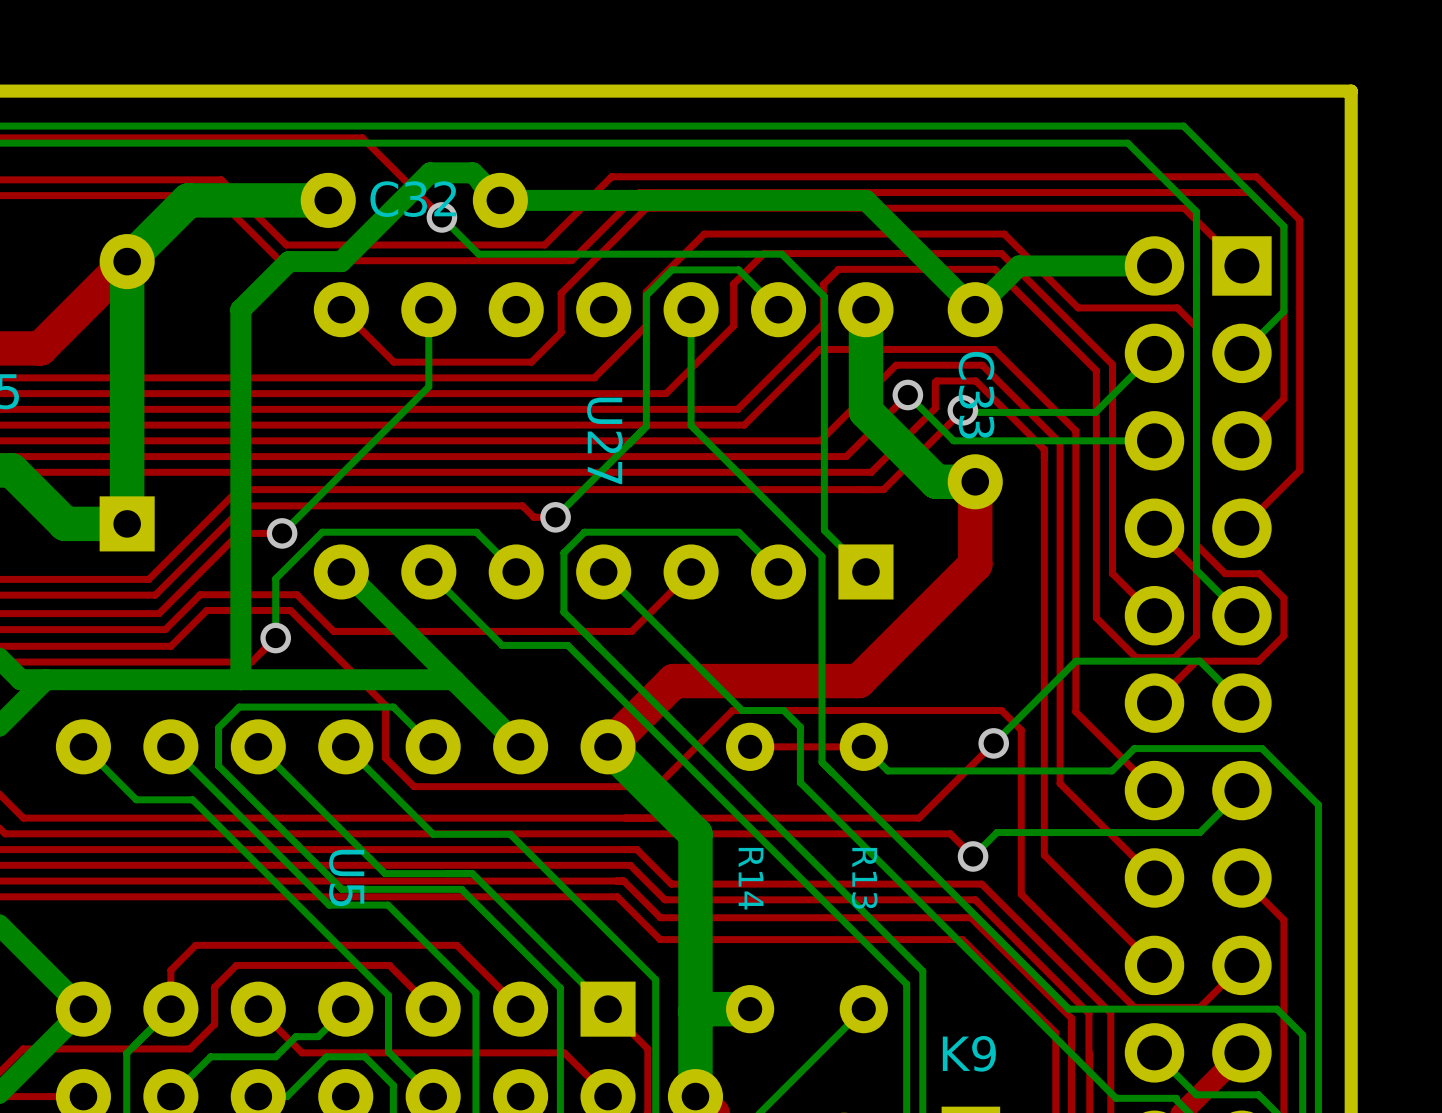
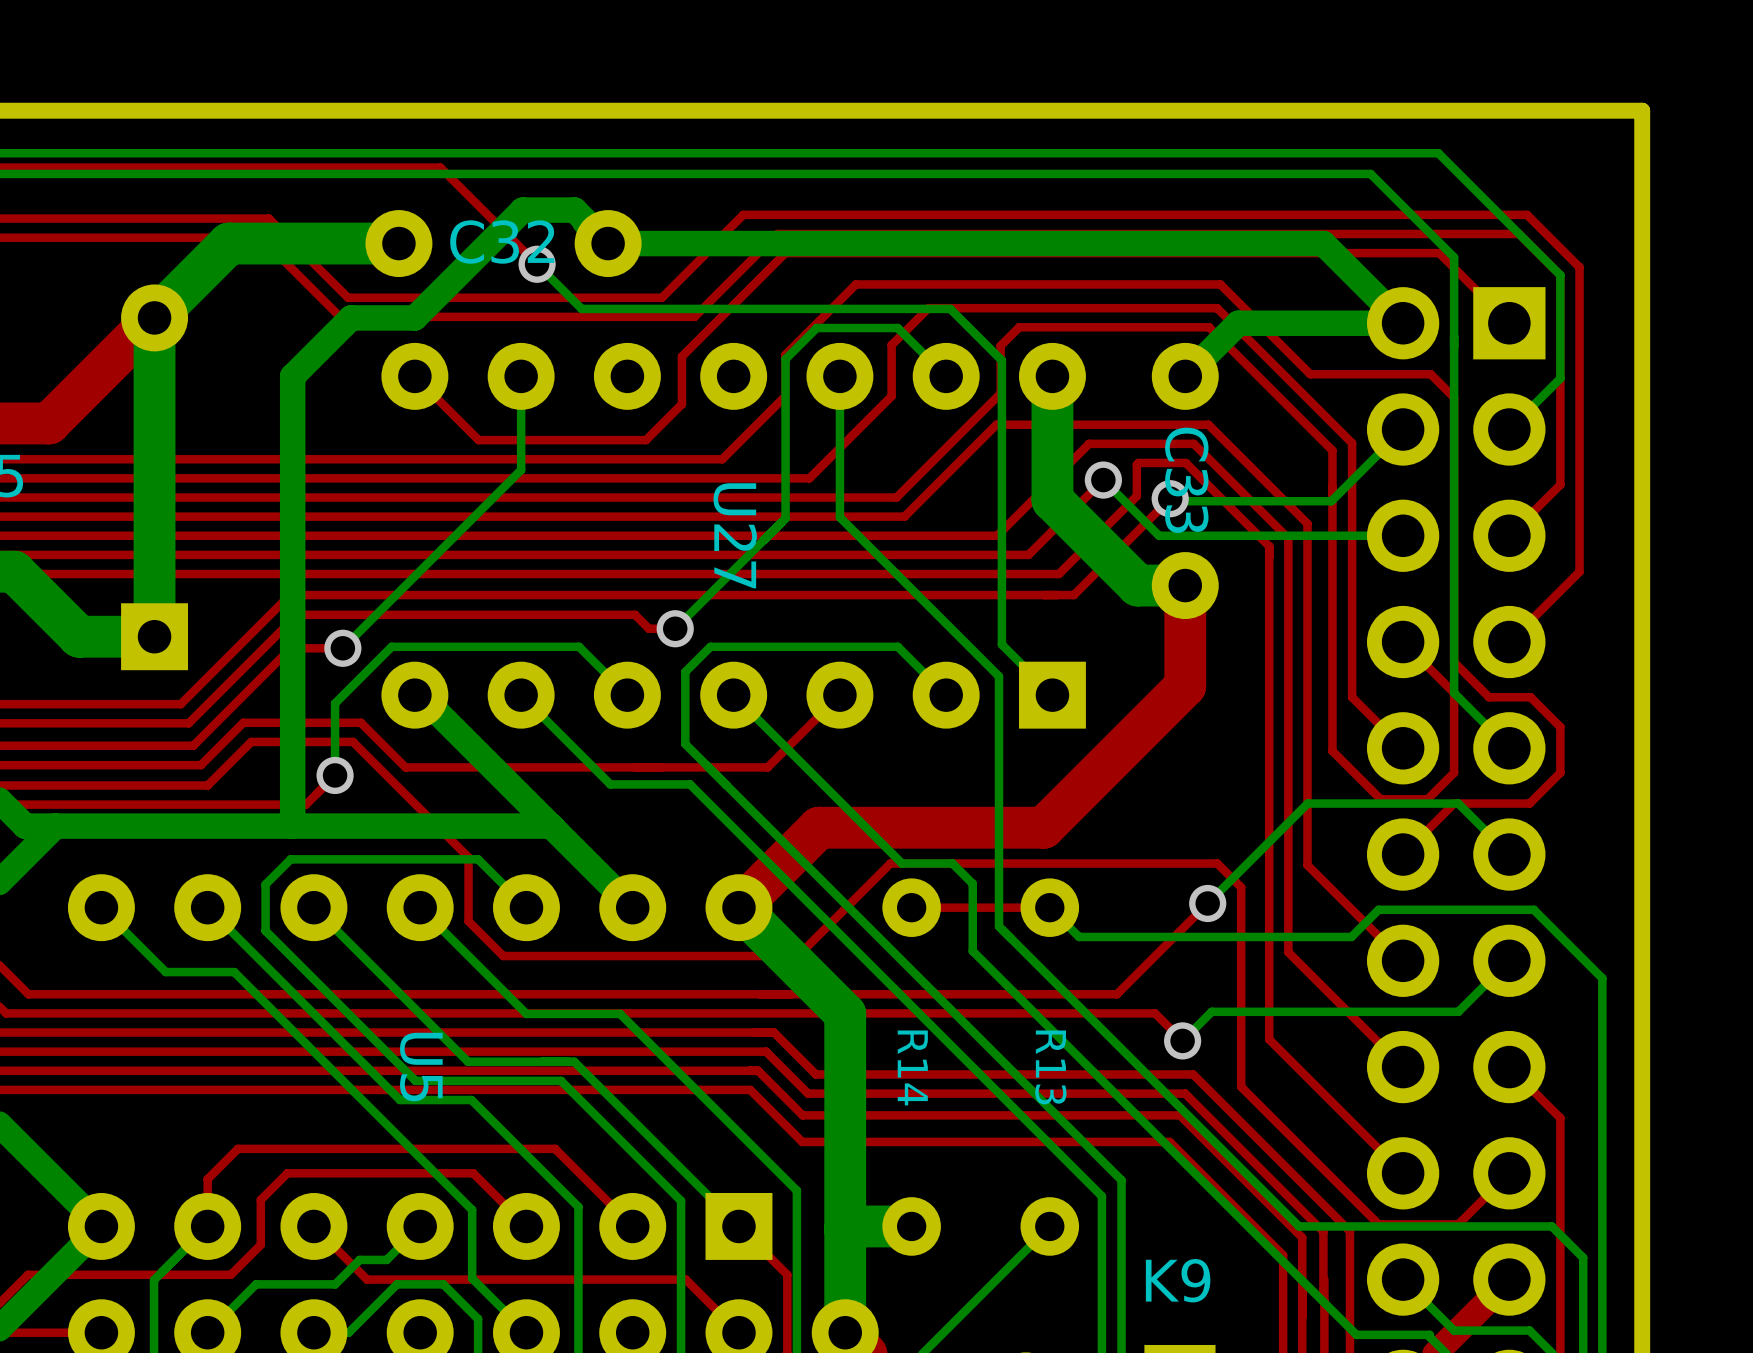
bottom track: (865, 200) (975, 309) -> (1052, 243) (1323, 243) (1403, 323)

